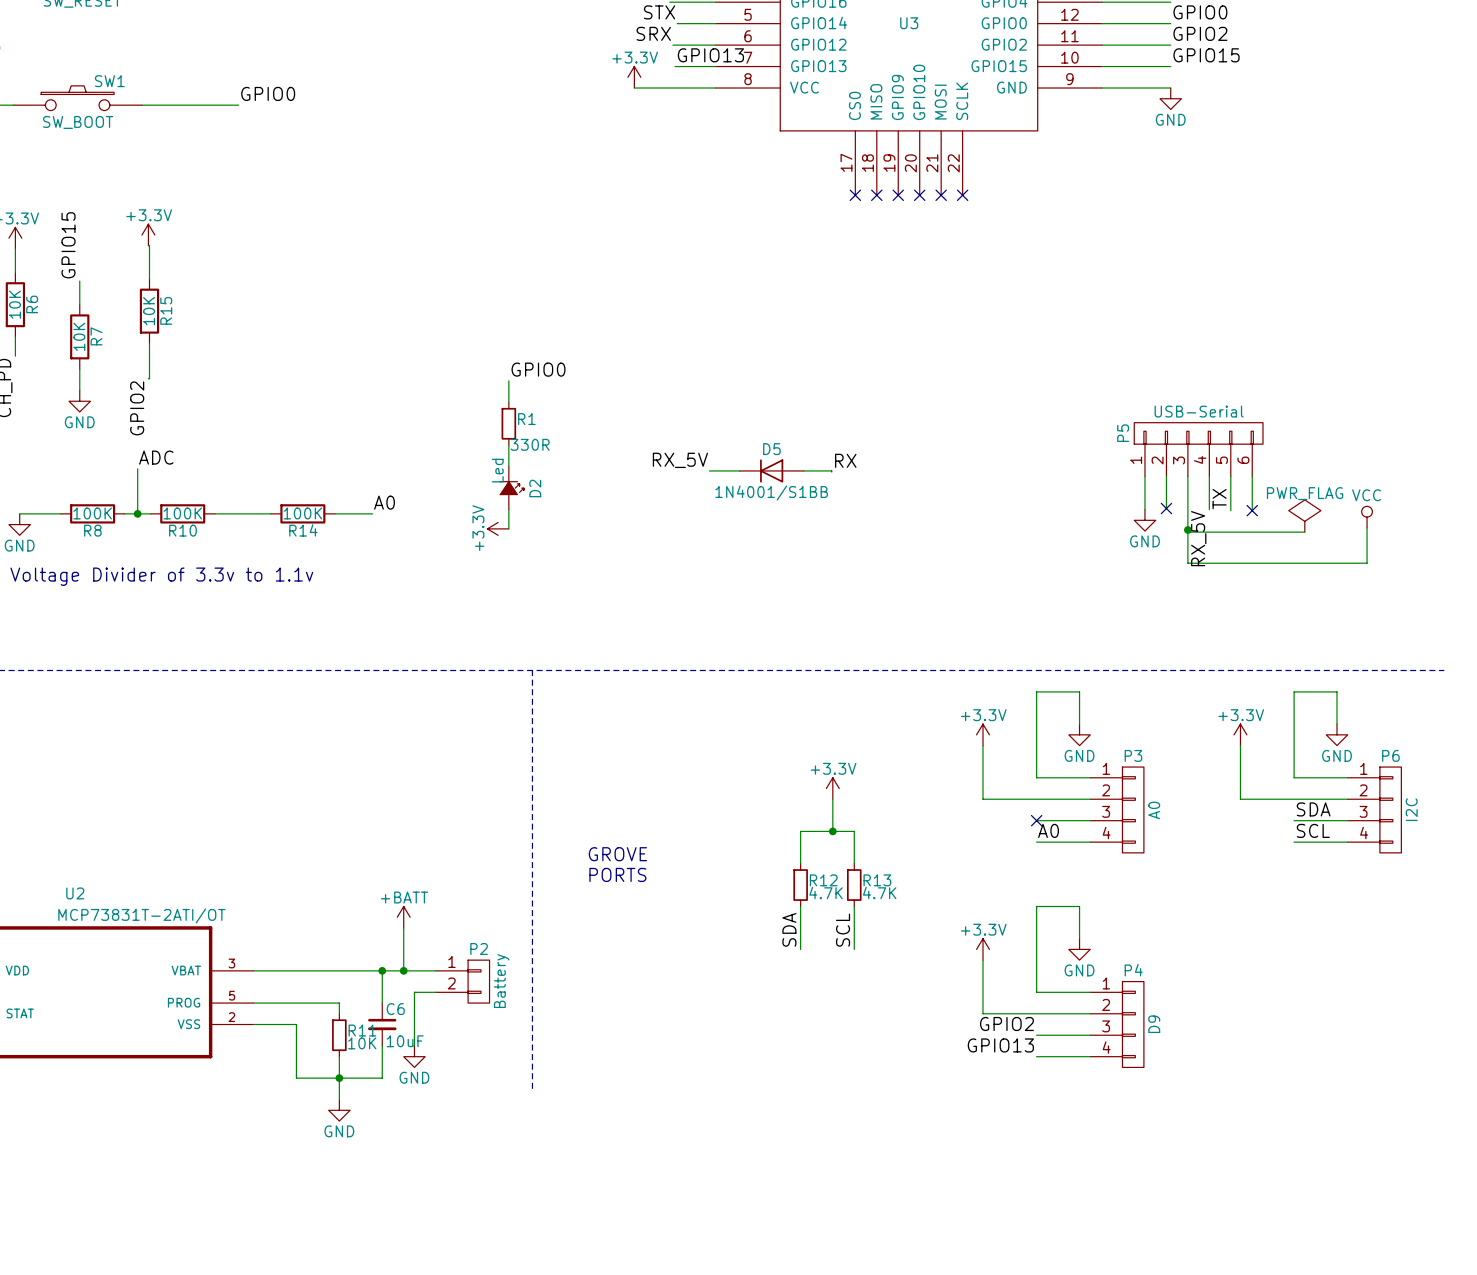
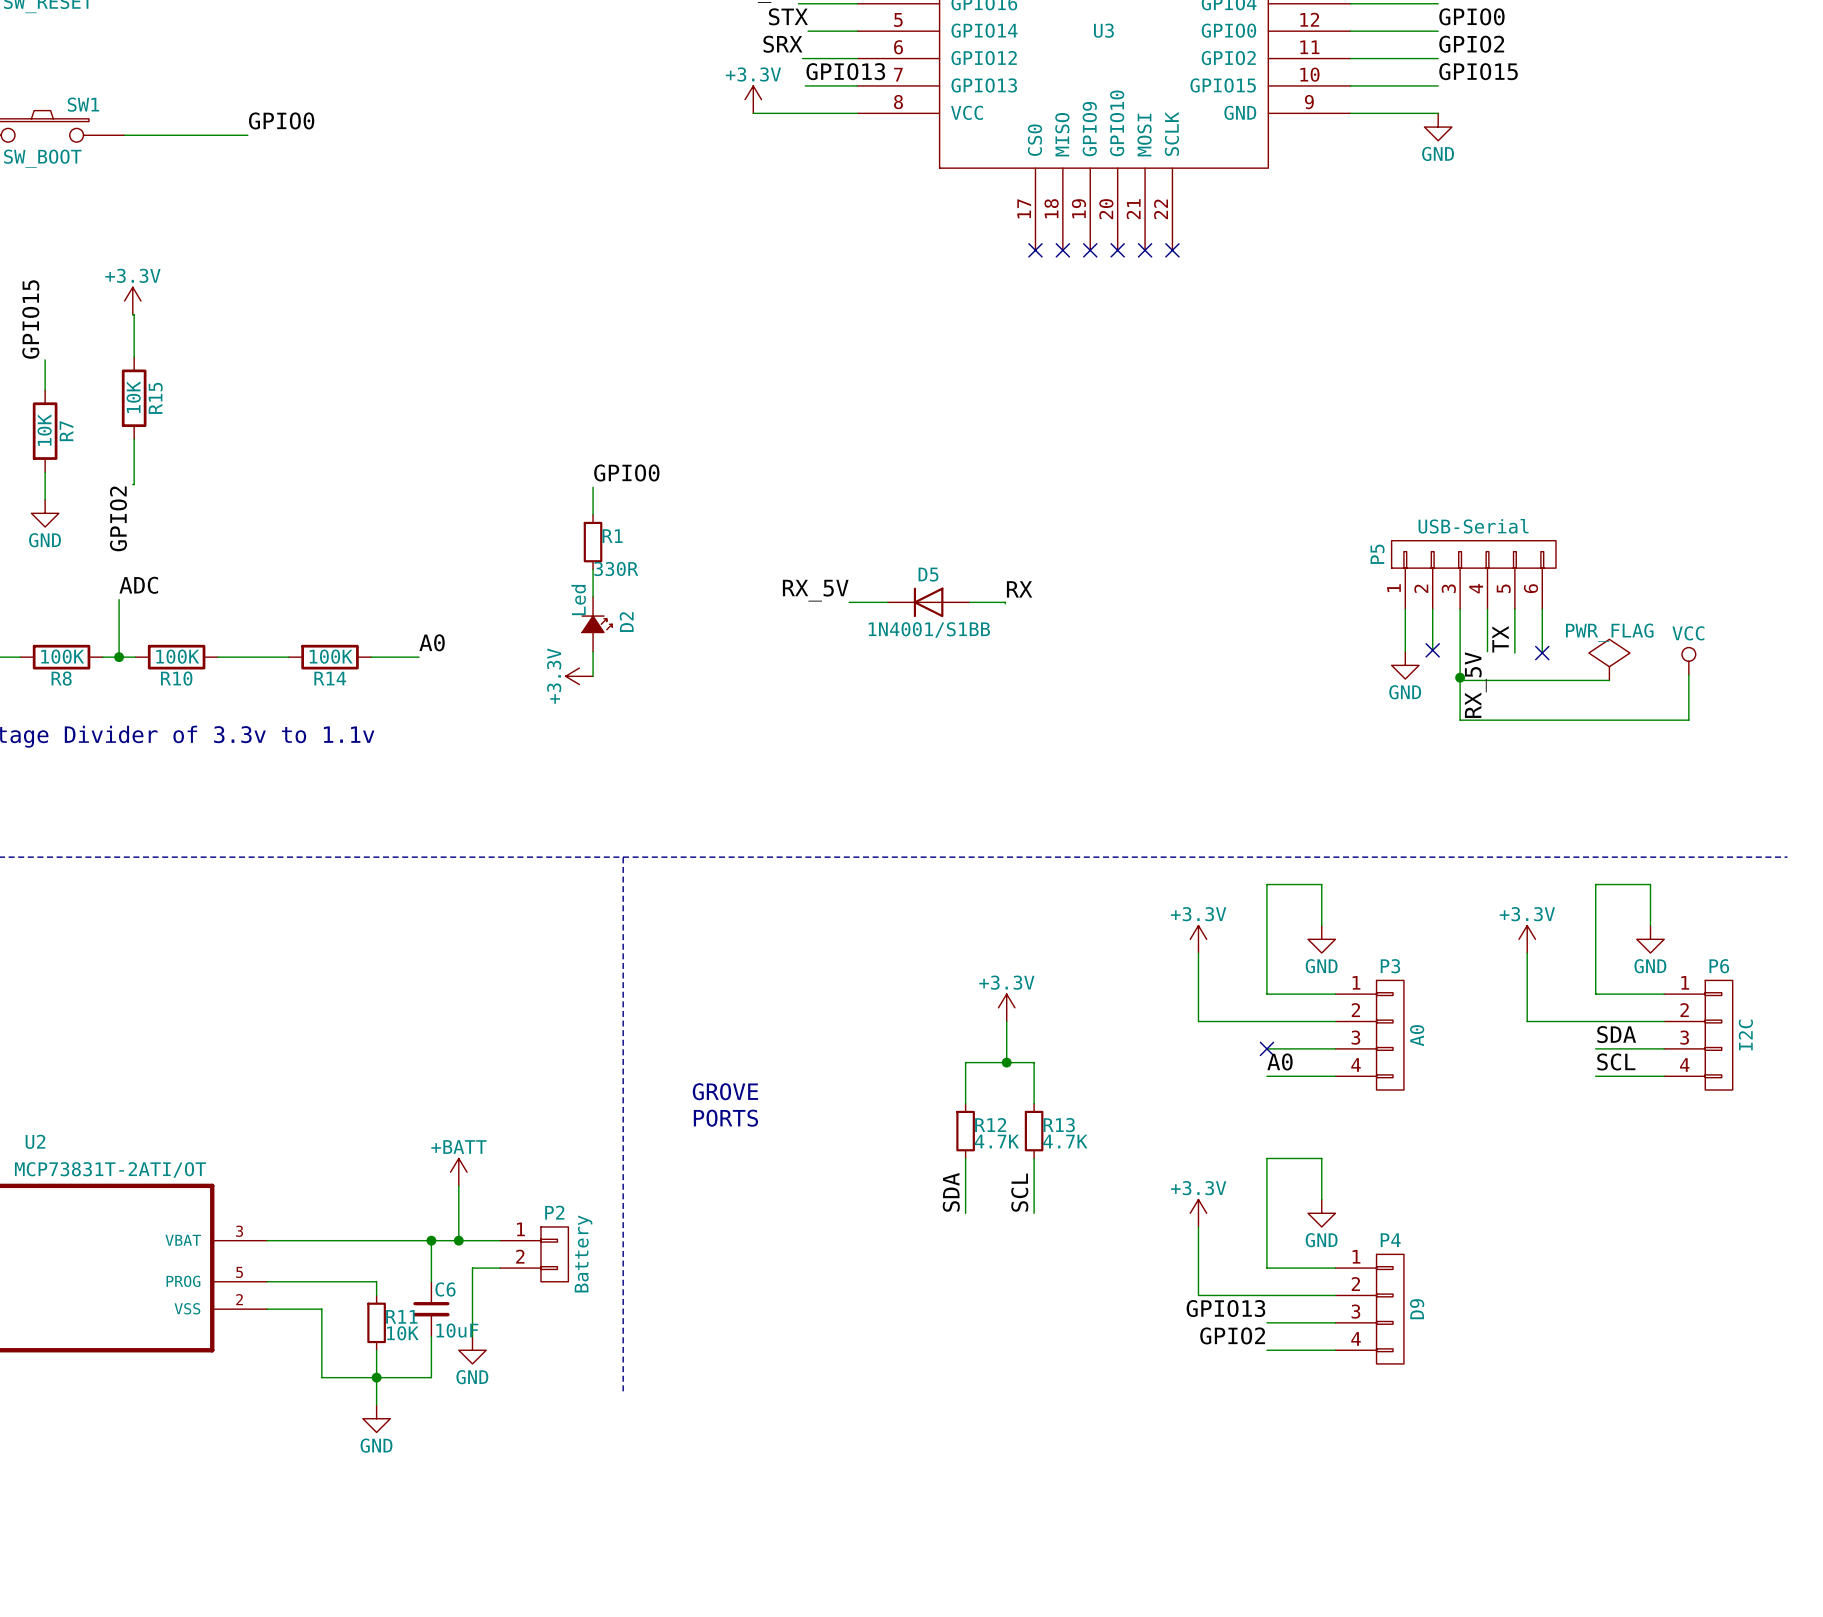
label: GPIO2 (1006, 1024) -> GPIO13 (1225, 1308)
label: GPIO13 (1000, 1045) -> GPIO2 (1232, 1335)

